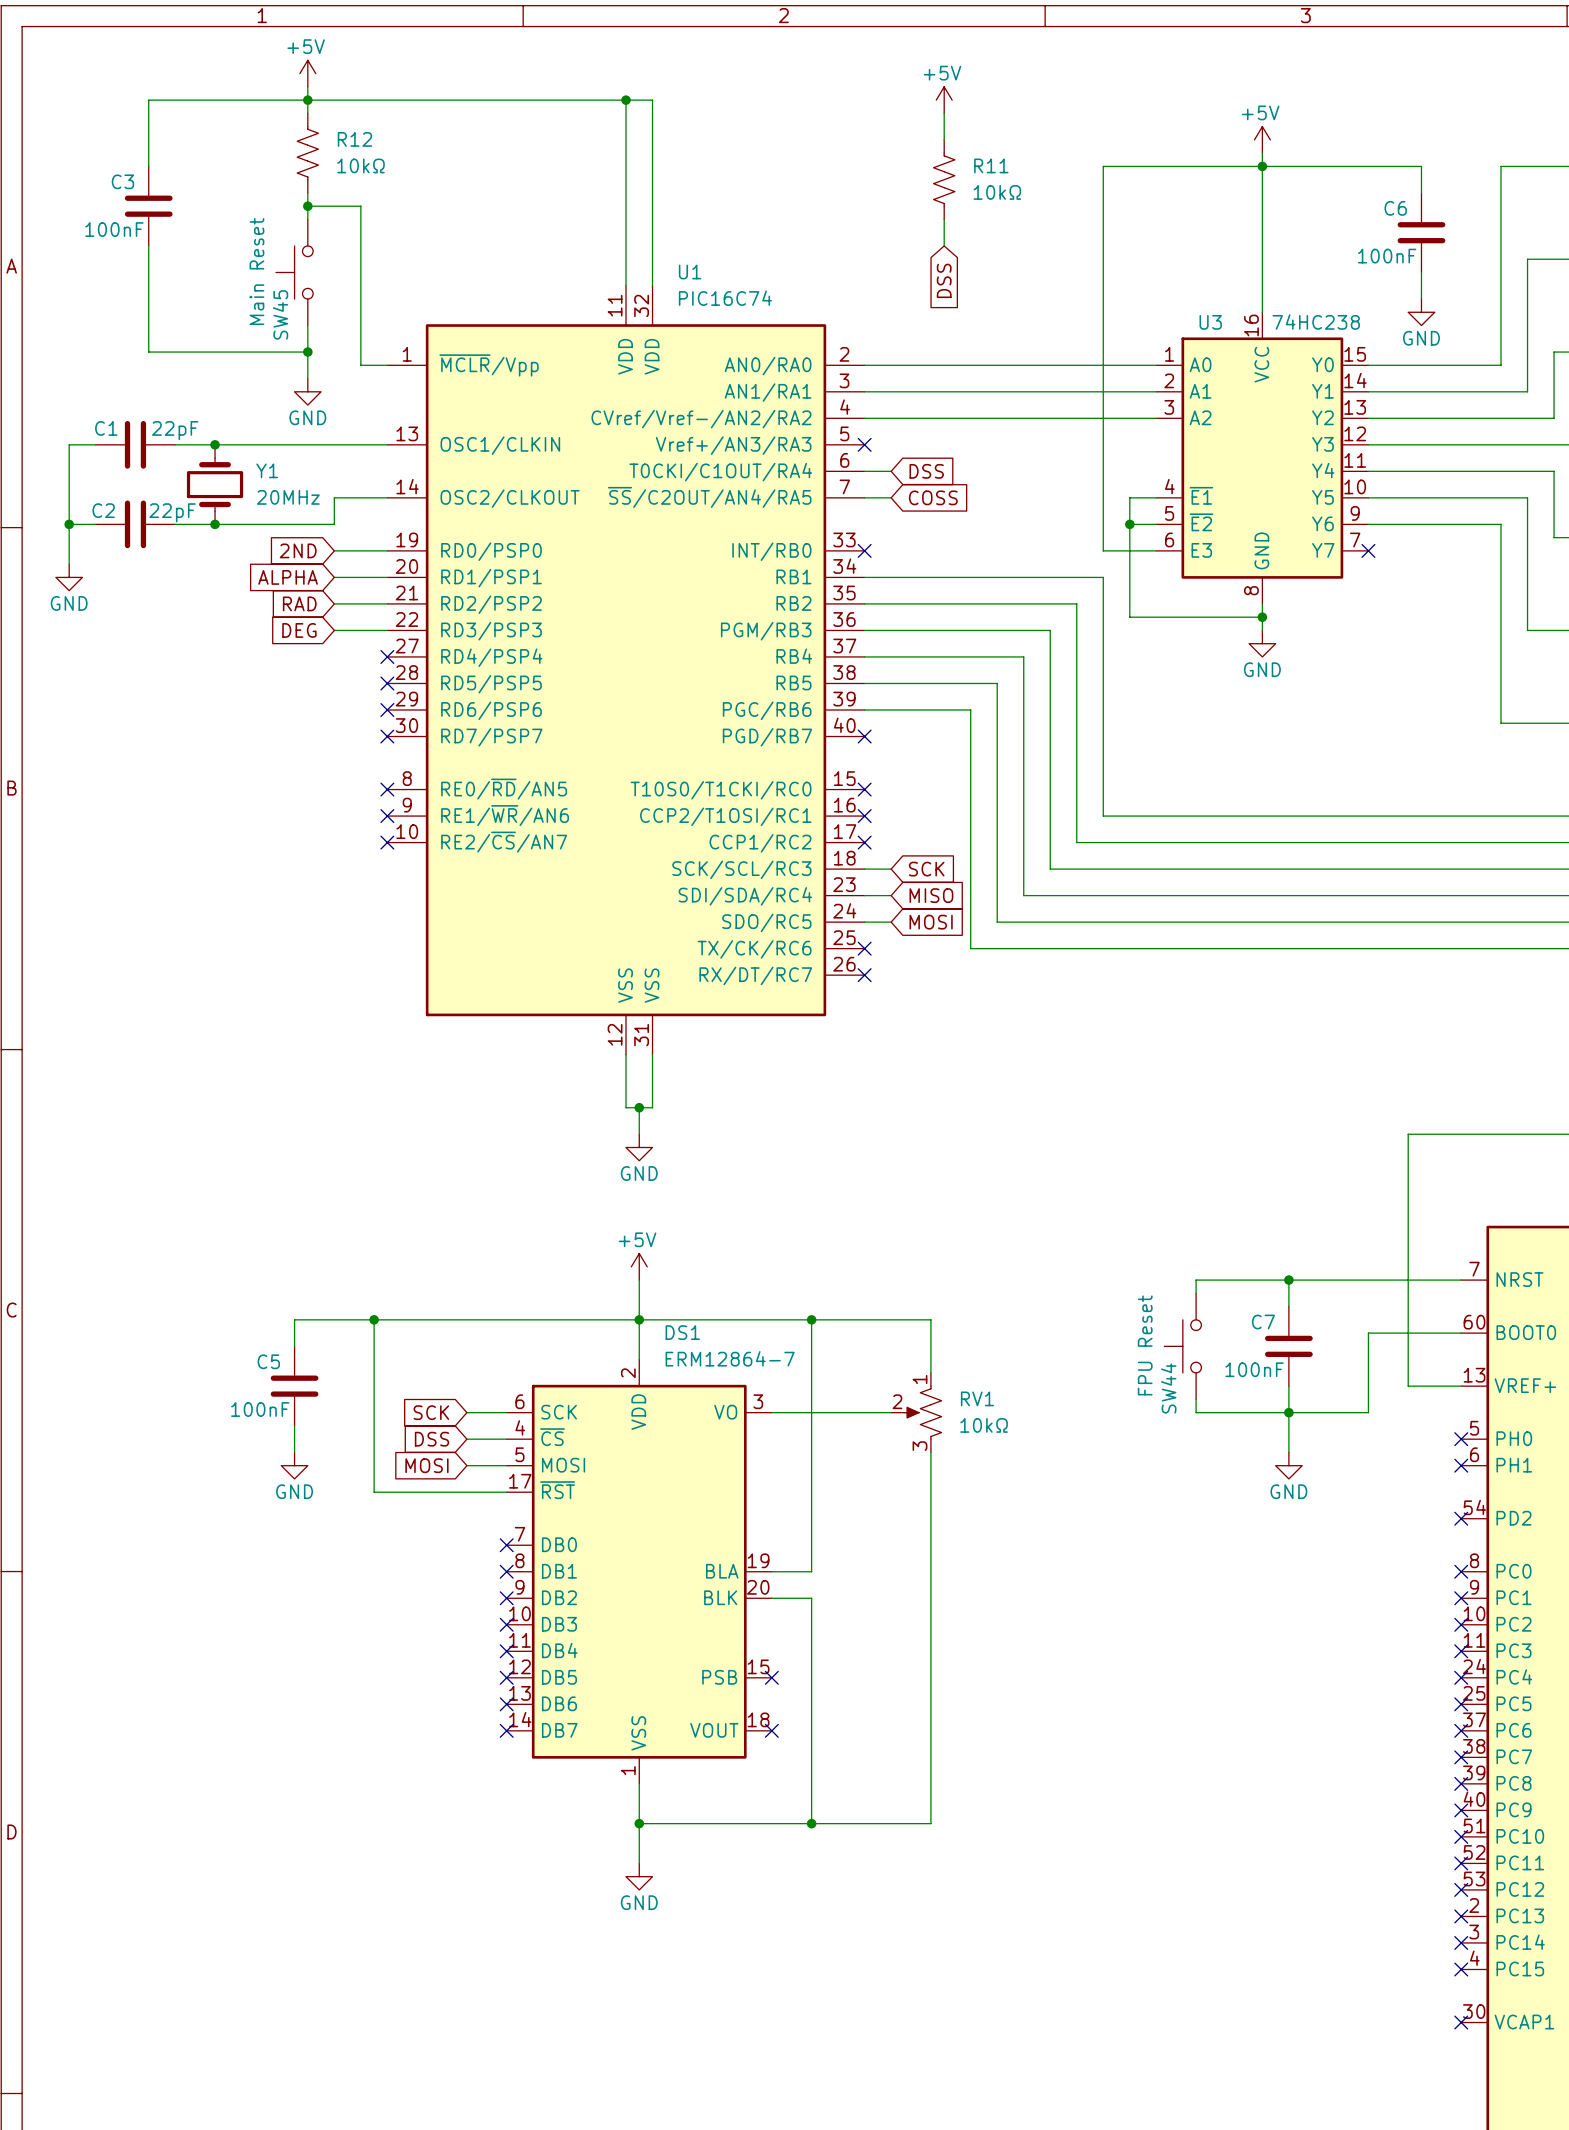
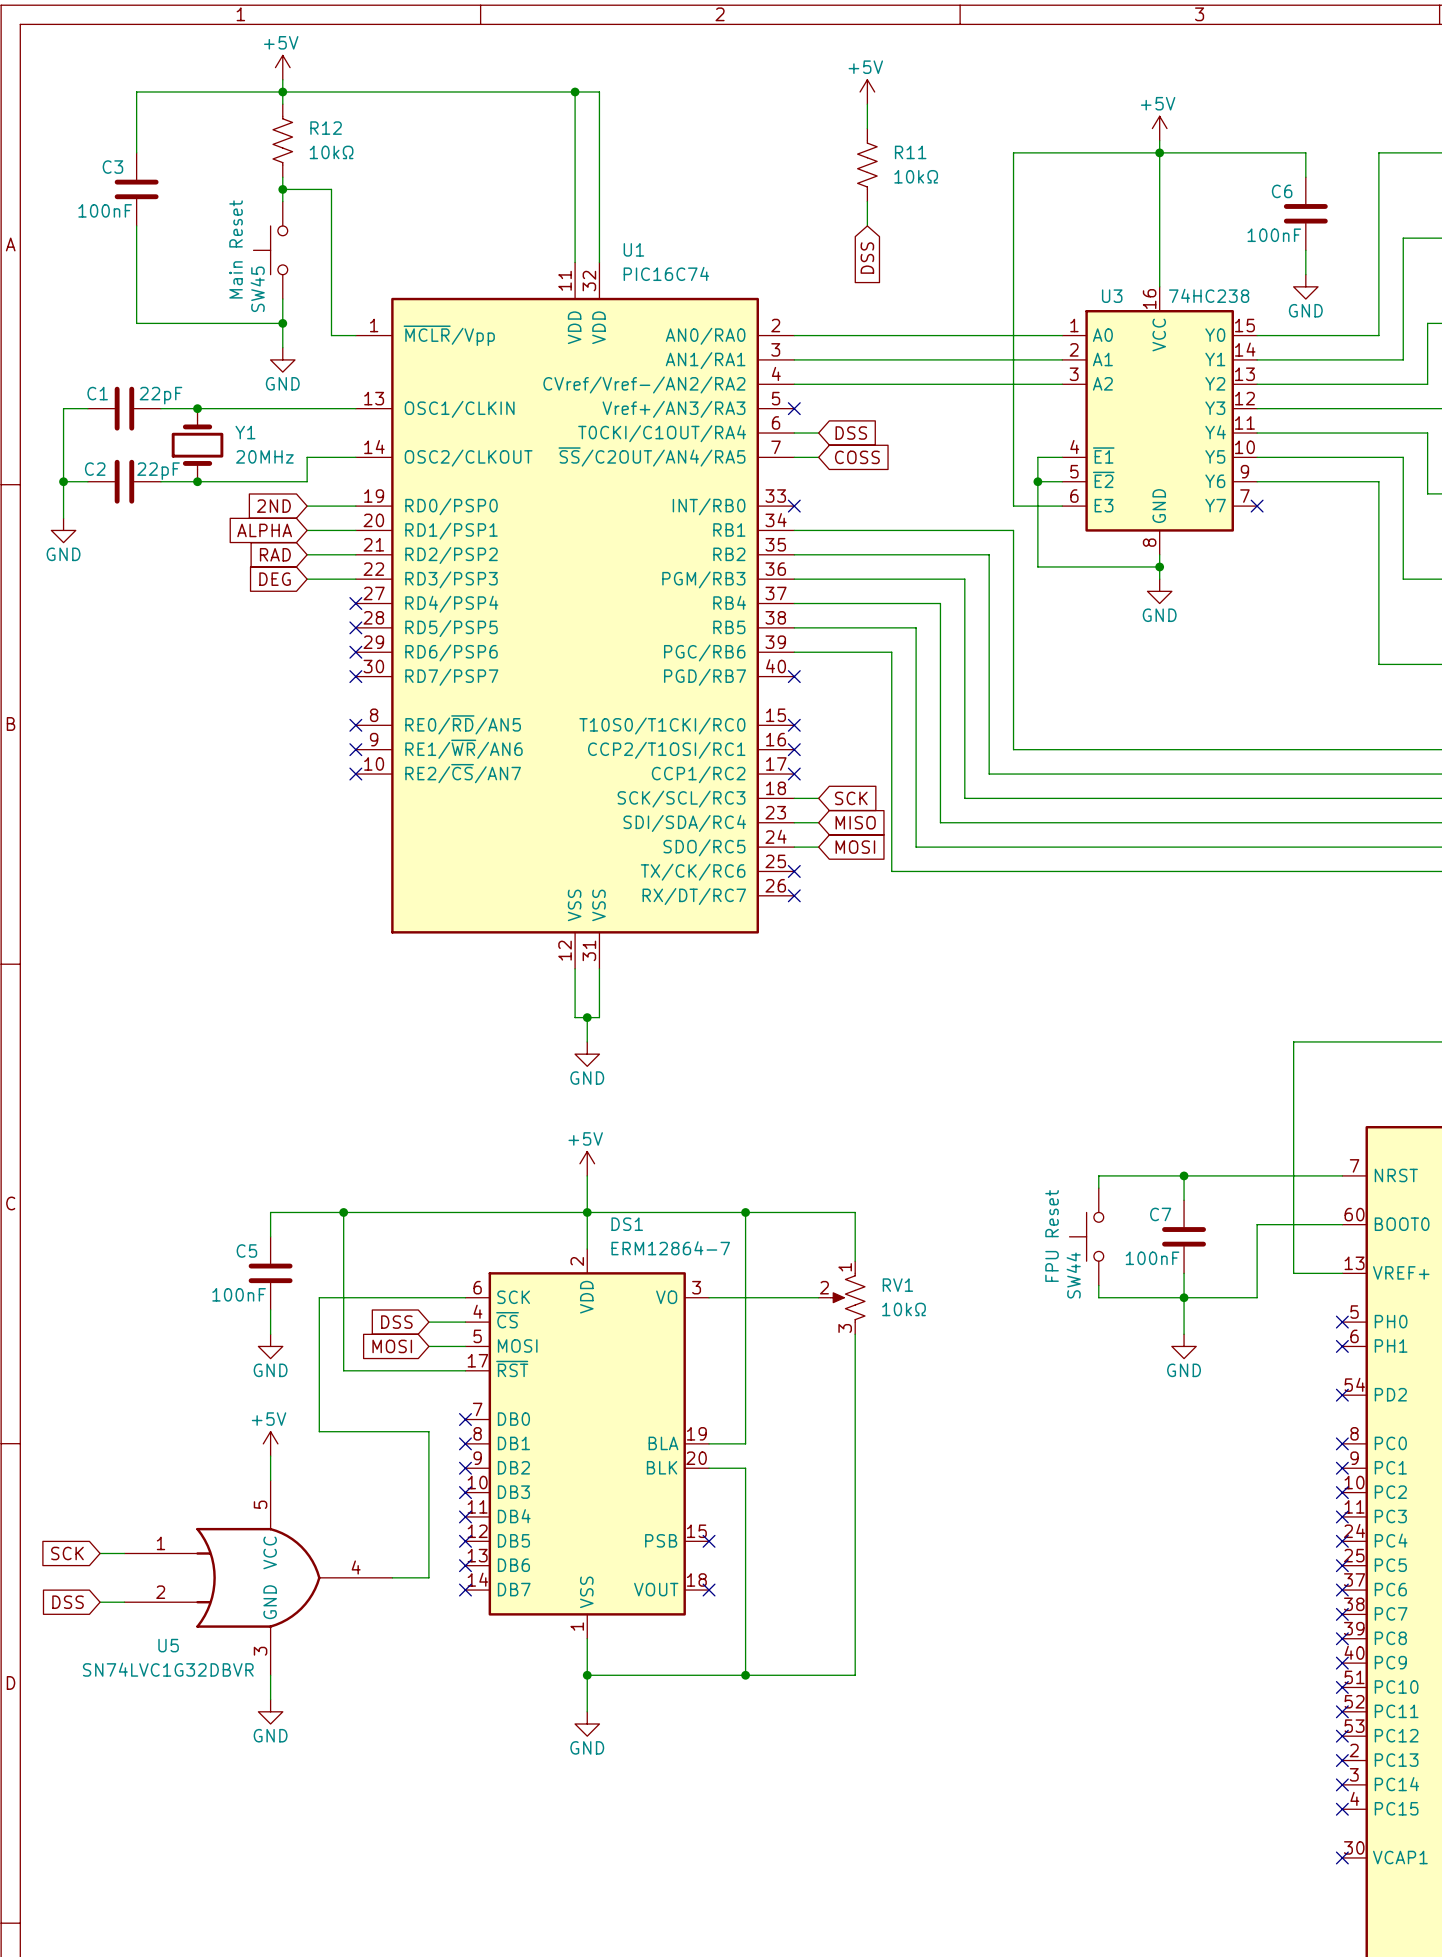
global label: SCK (431, 1412) -> none
wire: none -> (428, 1297) (319, 1297) (319, 1431) (428, 1431) (428, 1577) (392, 1577)
power symbol: none -> +5V (270, 1443)
wire: none -> (270, 1456) (270, 1480)
global label: none -> SCK (67, 1553)
wire: none -> (100, 1553) (124, 1553)
U5: none -> SN74LVC1G32DBVR (258, 1577)
global label: none -> DSS (68, 1602)
wire: none -> (100, 1602) (124, 1602)
wire: none -> (270, 1675) (270, 1699)
power symbol: none -> GND (270, 1711)

